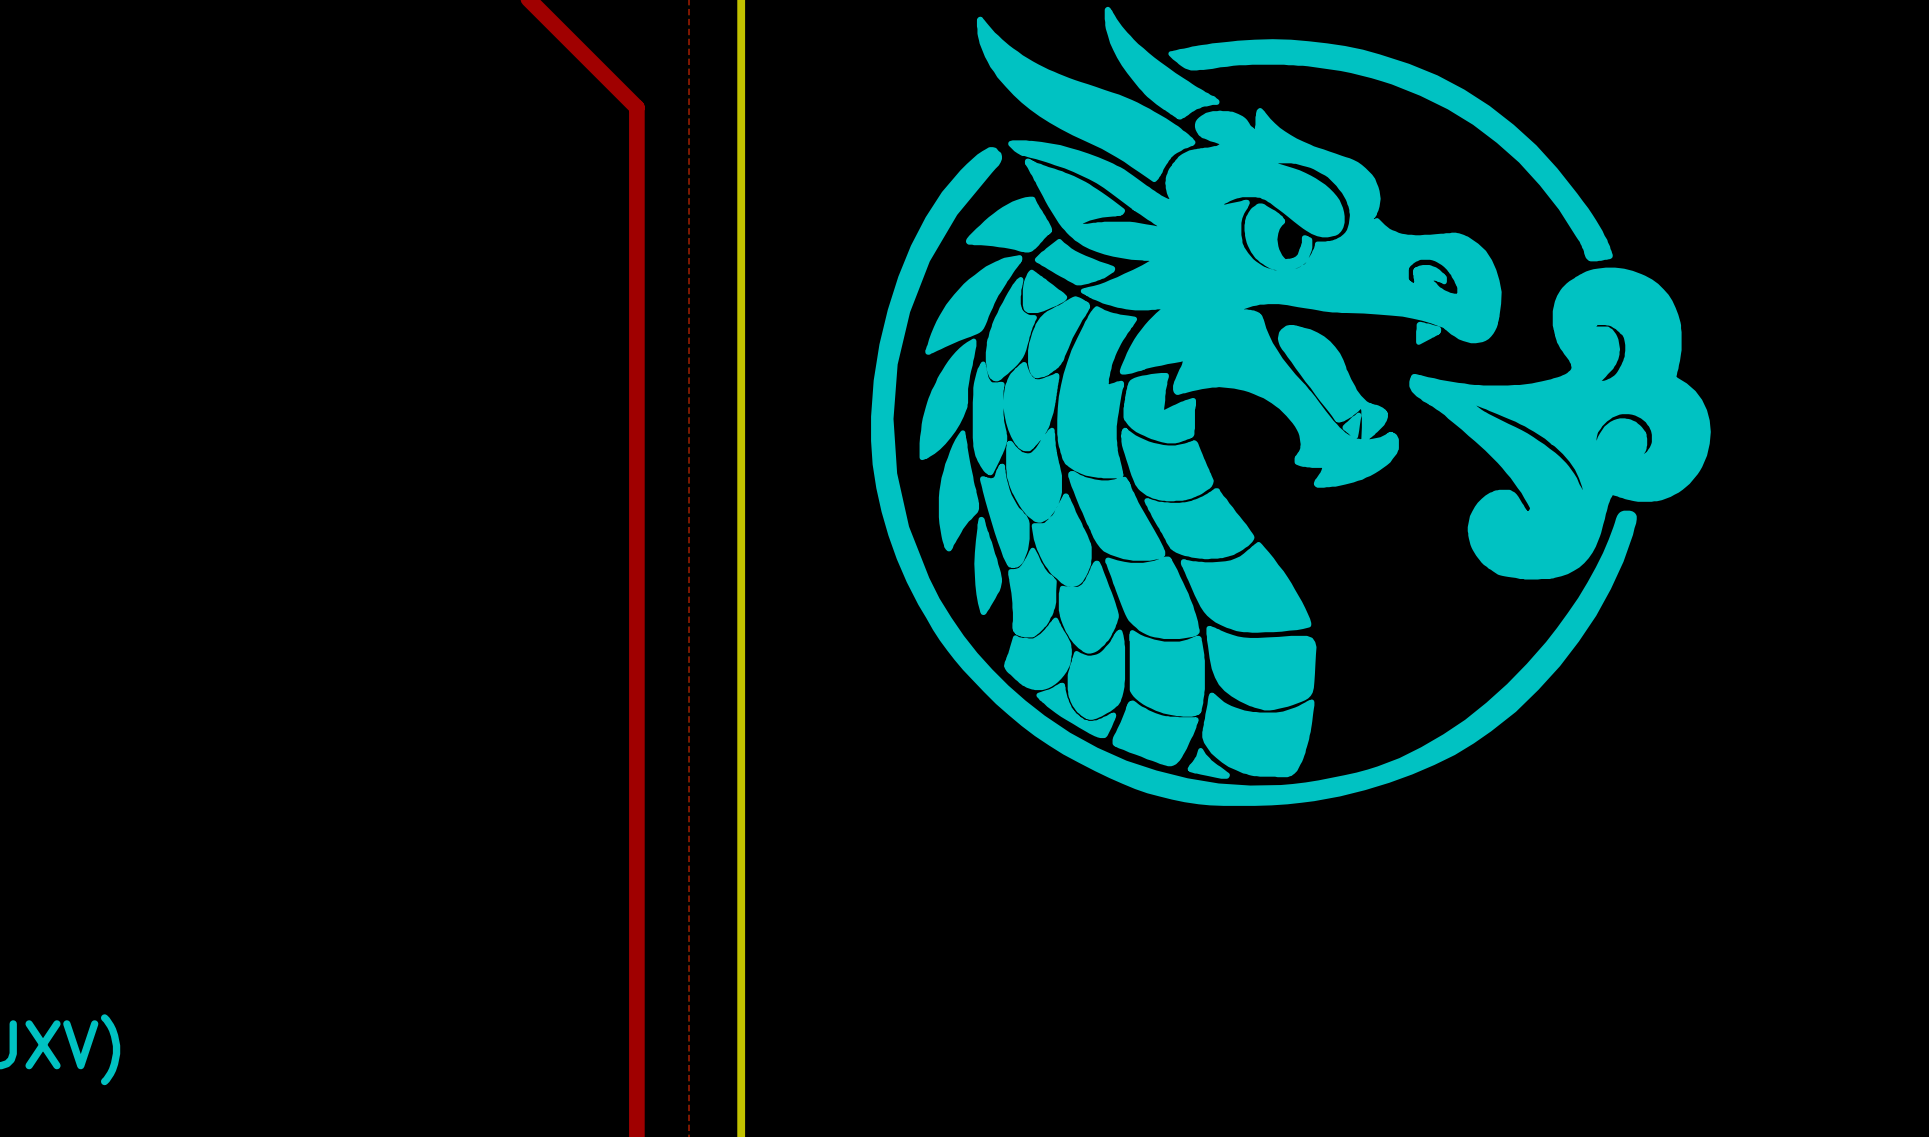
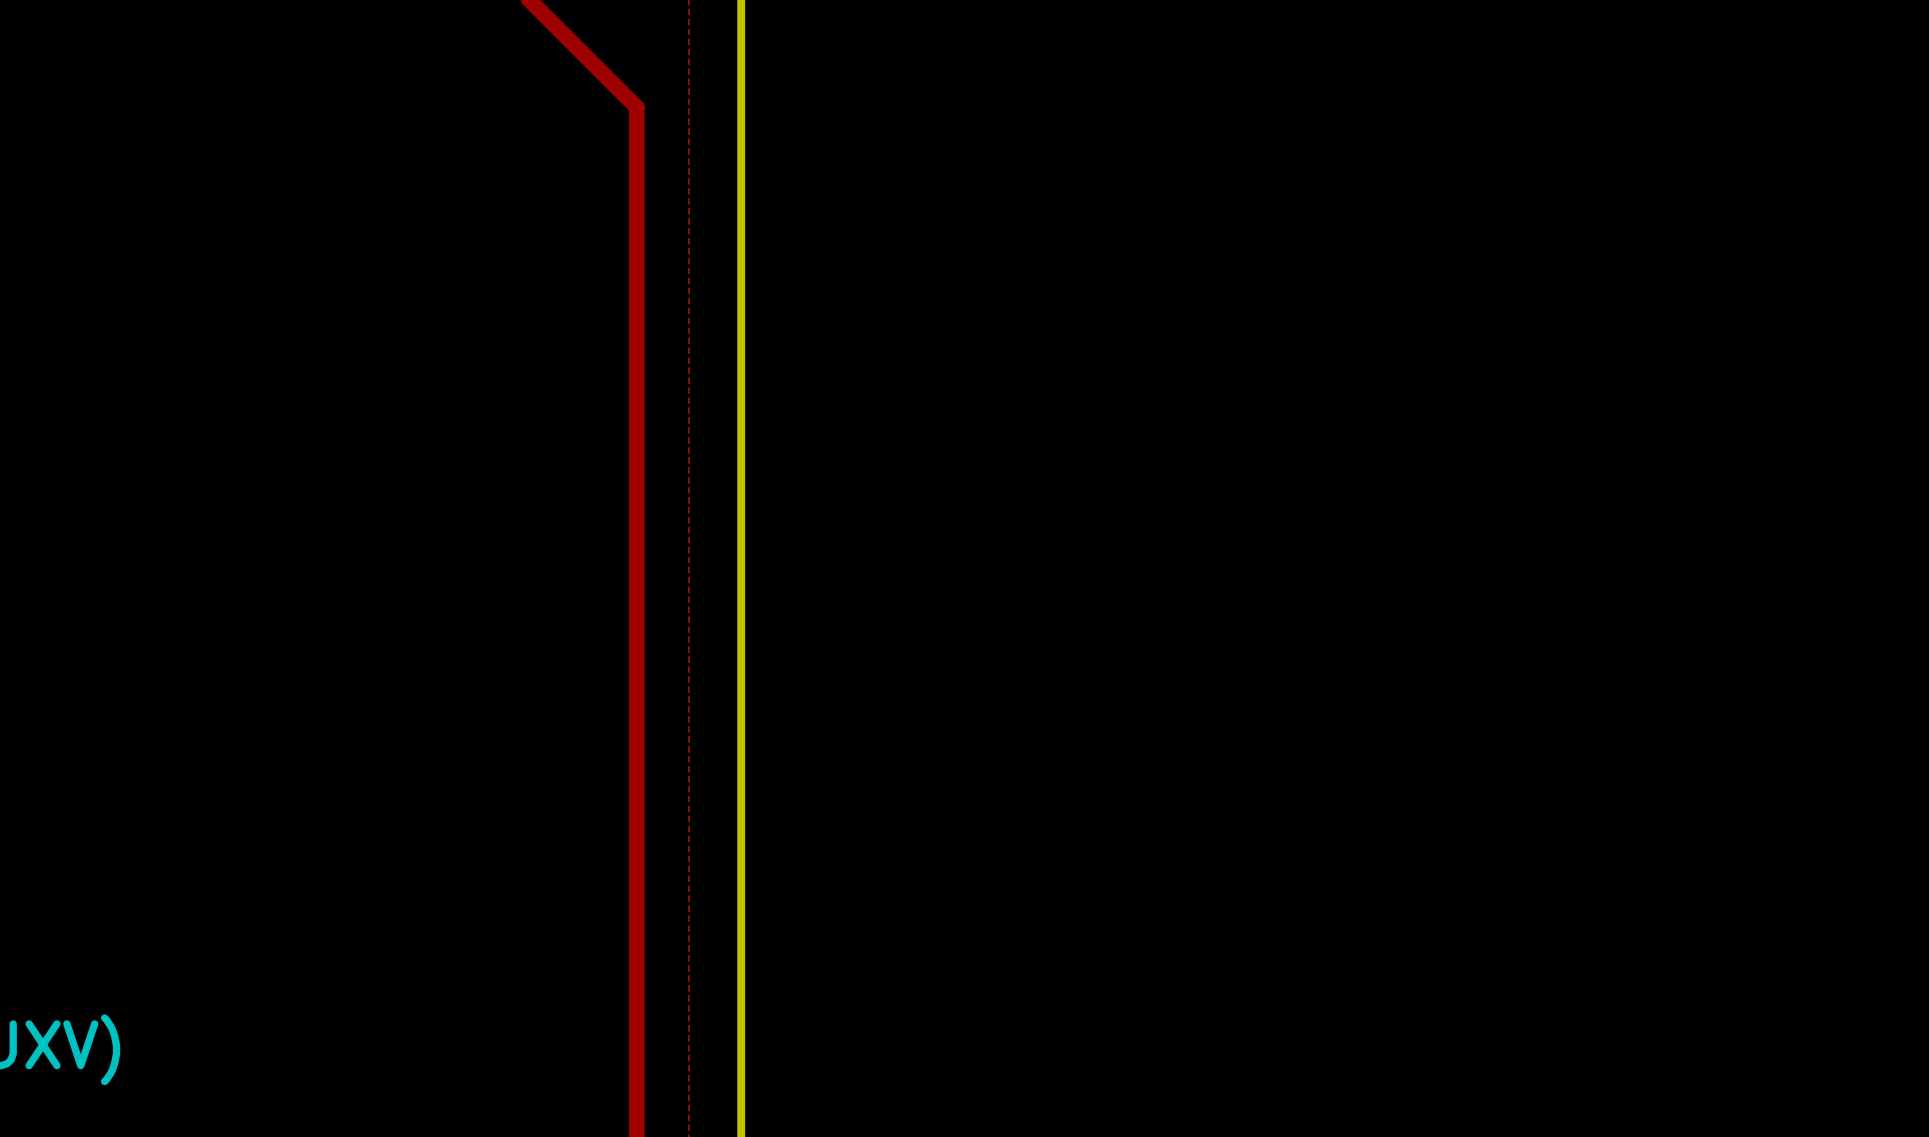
drawing: [871, 6, 1711, 806] -> none

